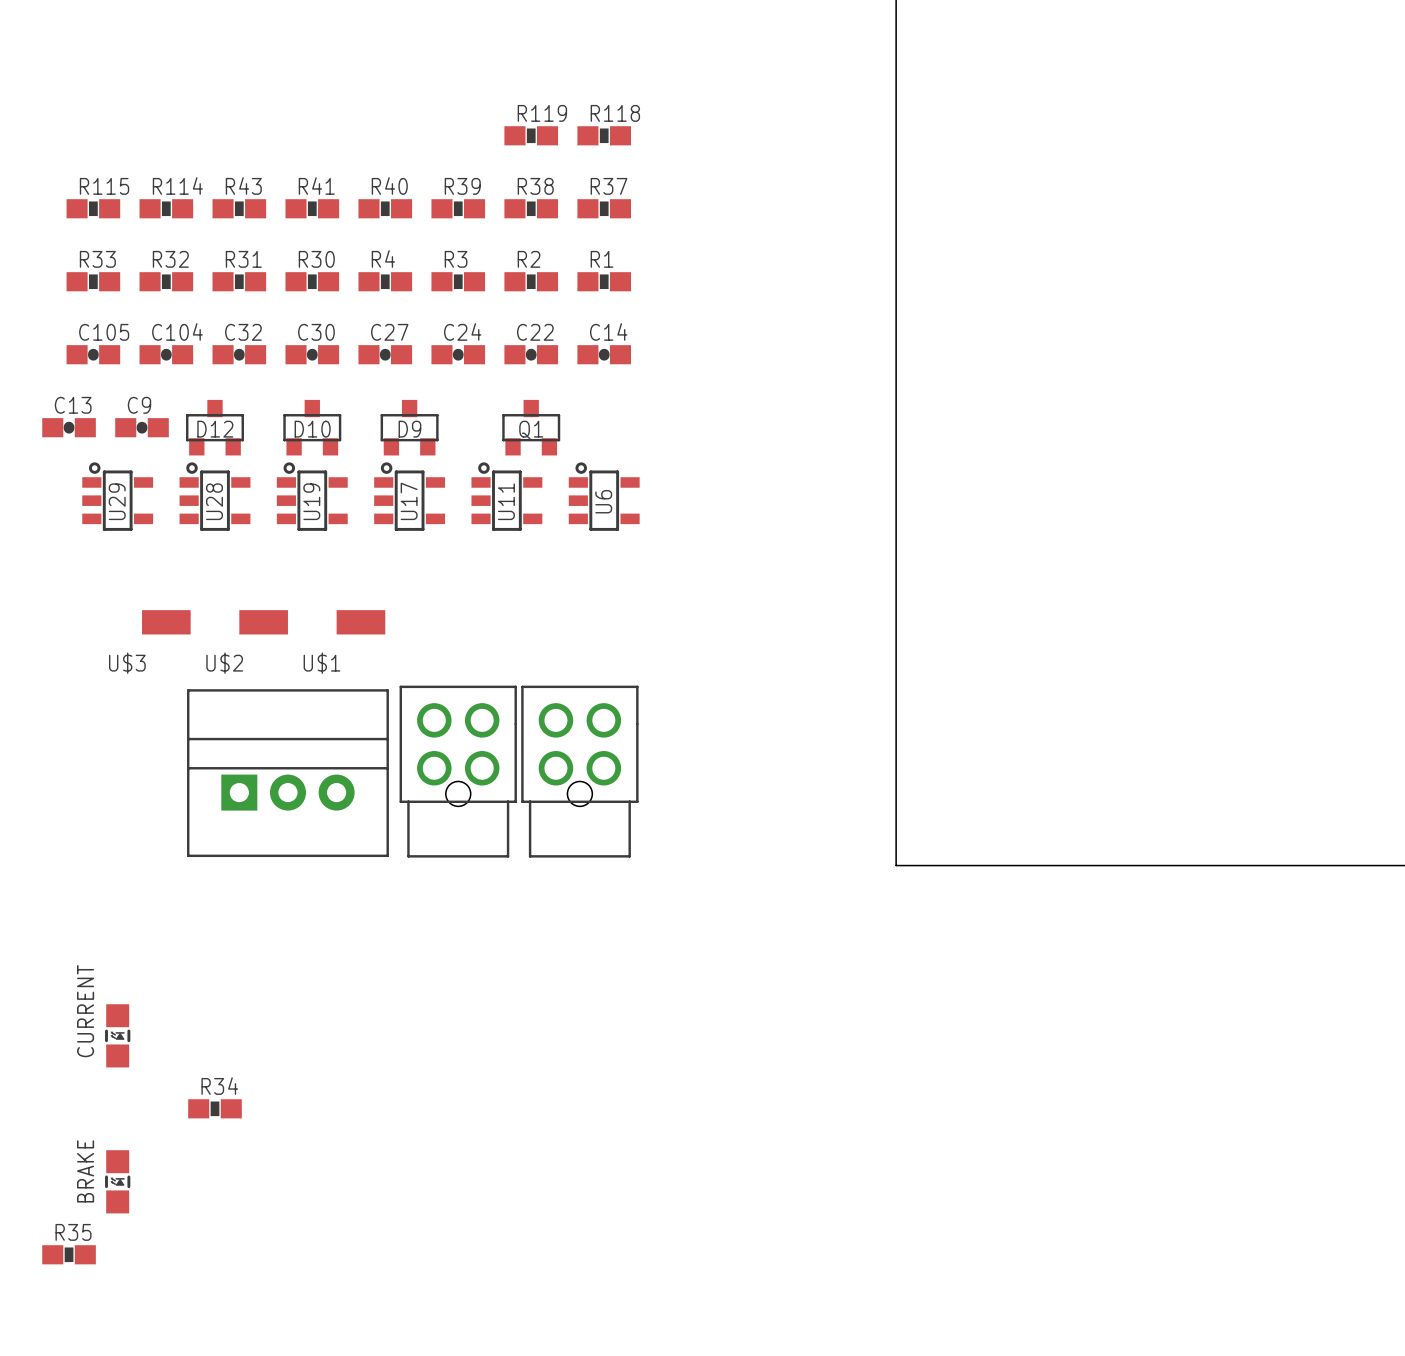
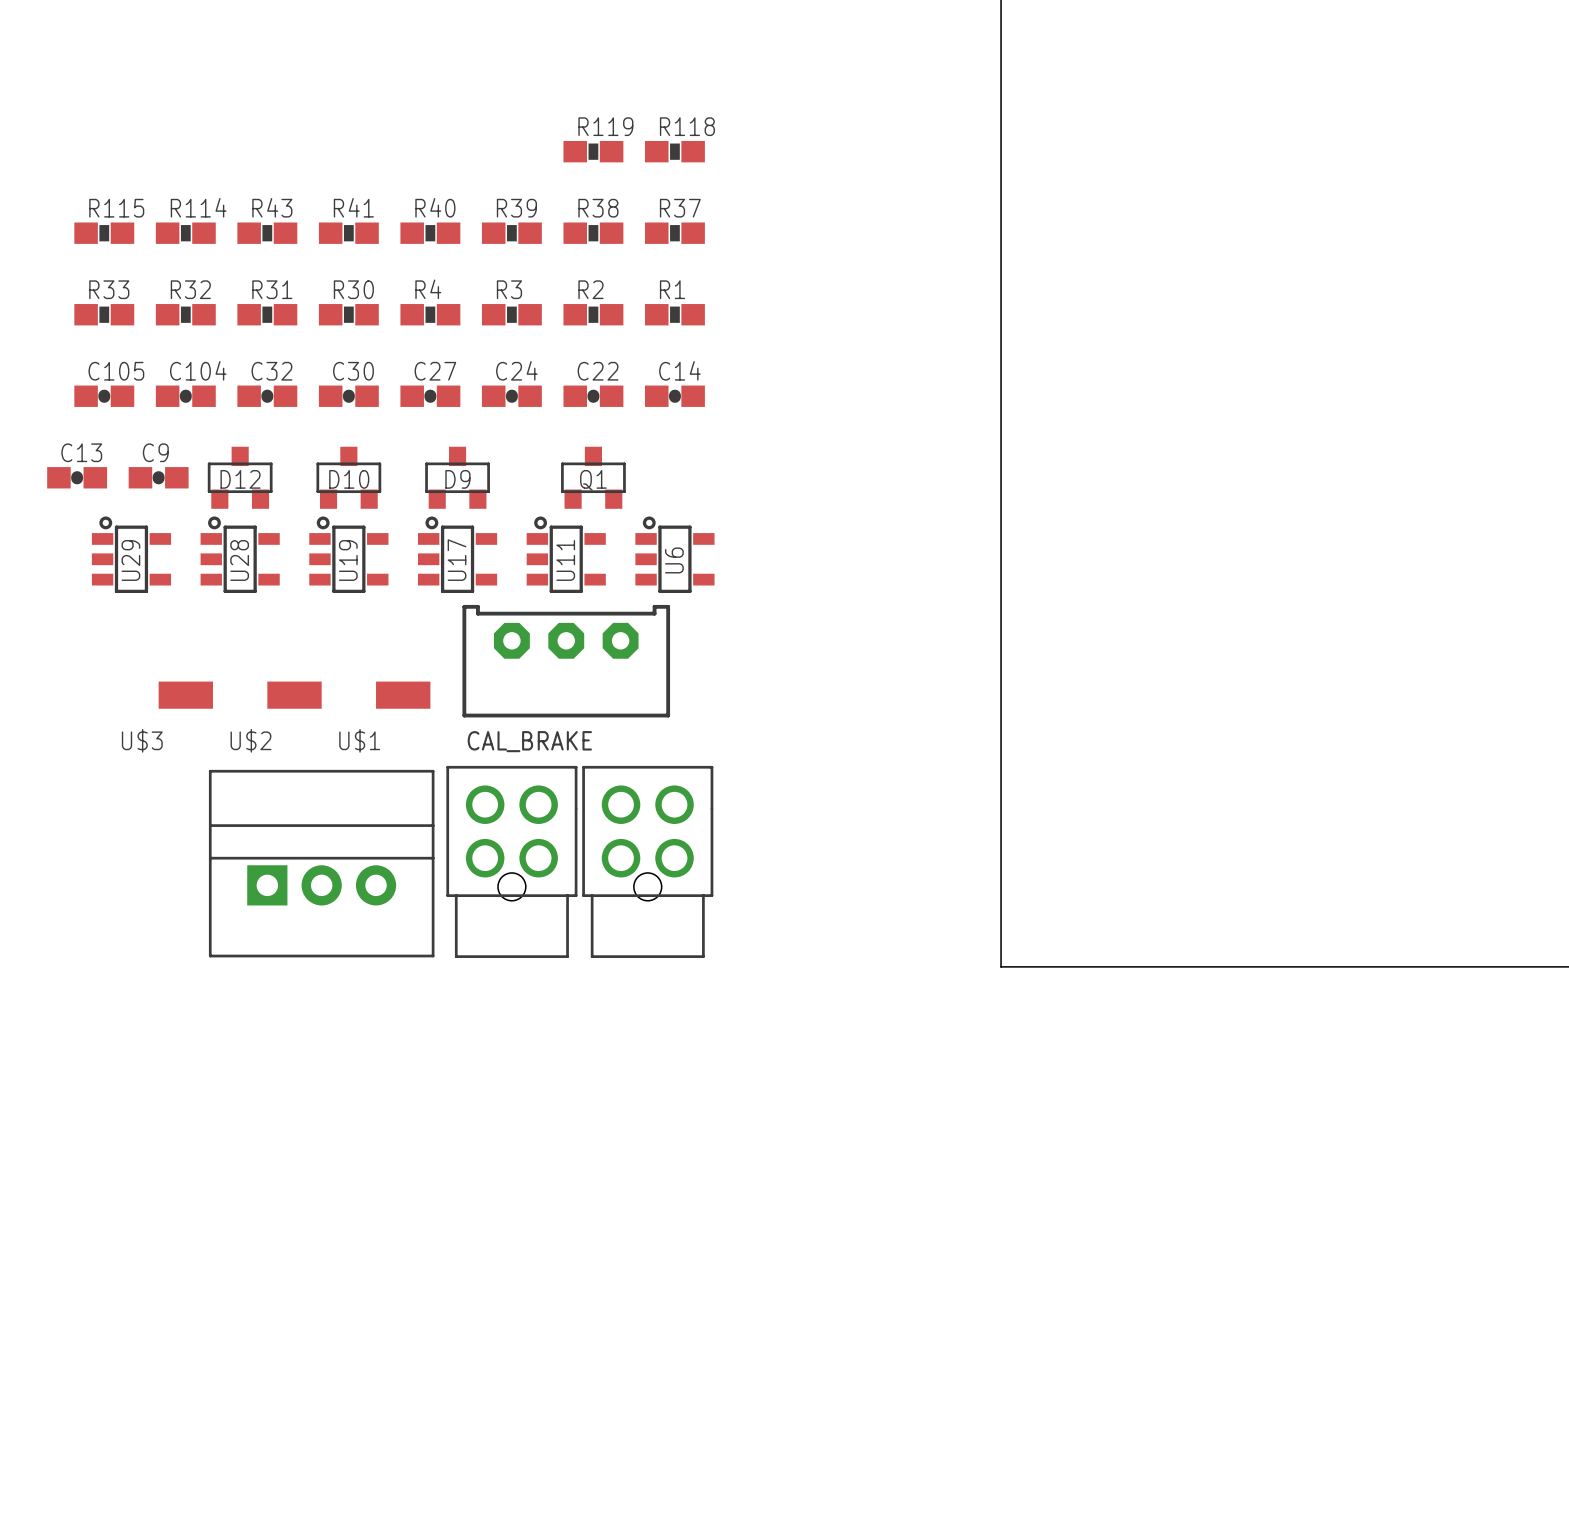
CAL_BRAKE: none -> (566, 661)
CURRENT: (117, 1035) -> none
R34: (214, 1108) -> none
BRAKE: (117, 1181) -> none
R35: (69, 1254) -> none

